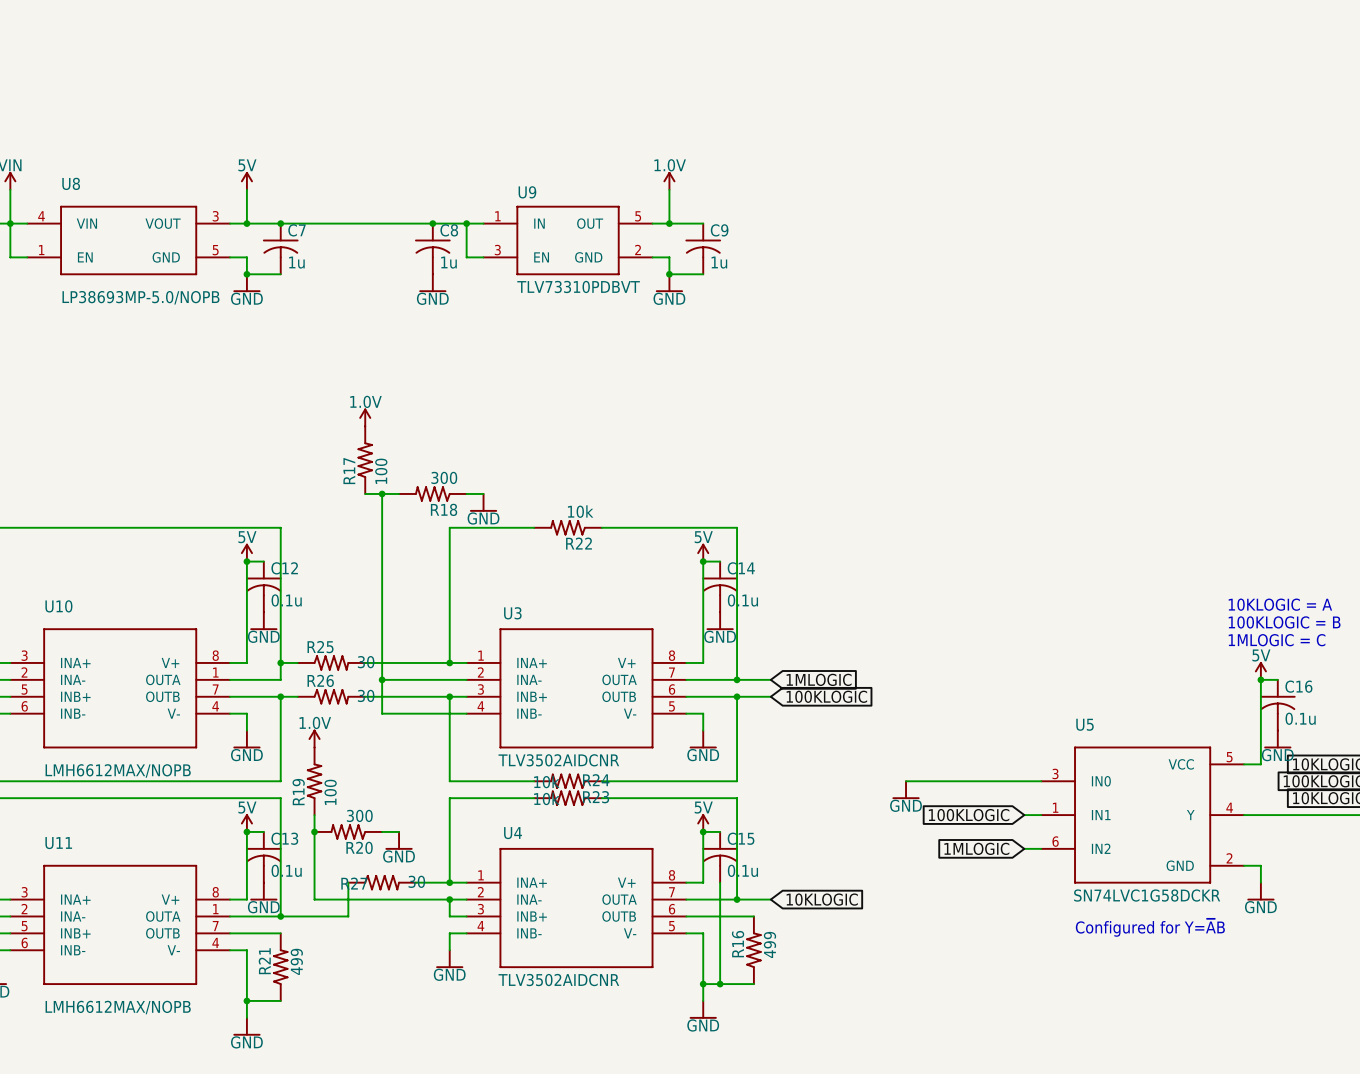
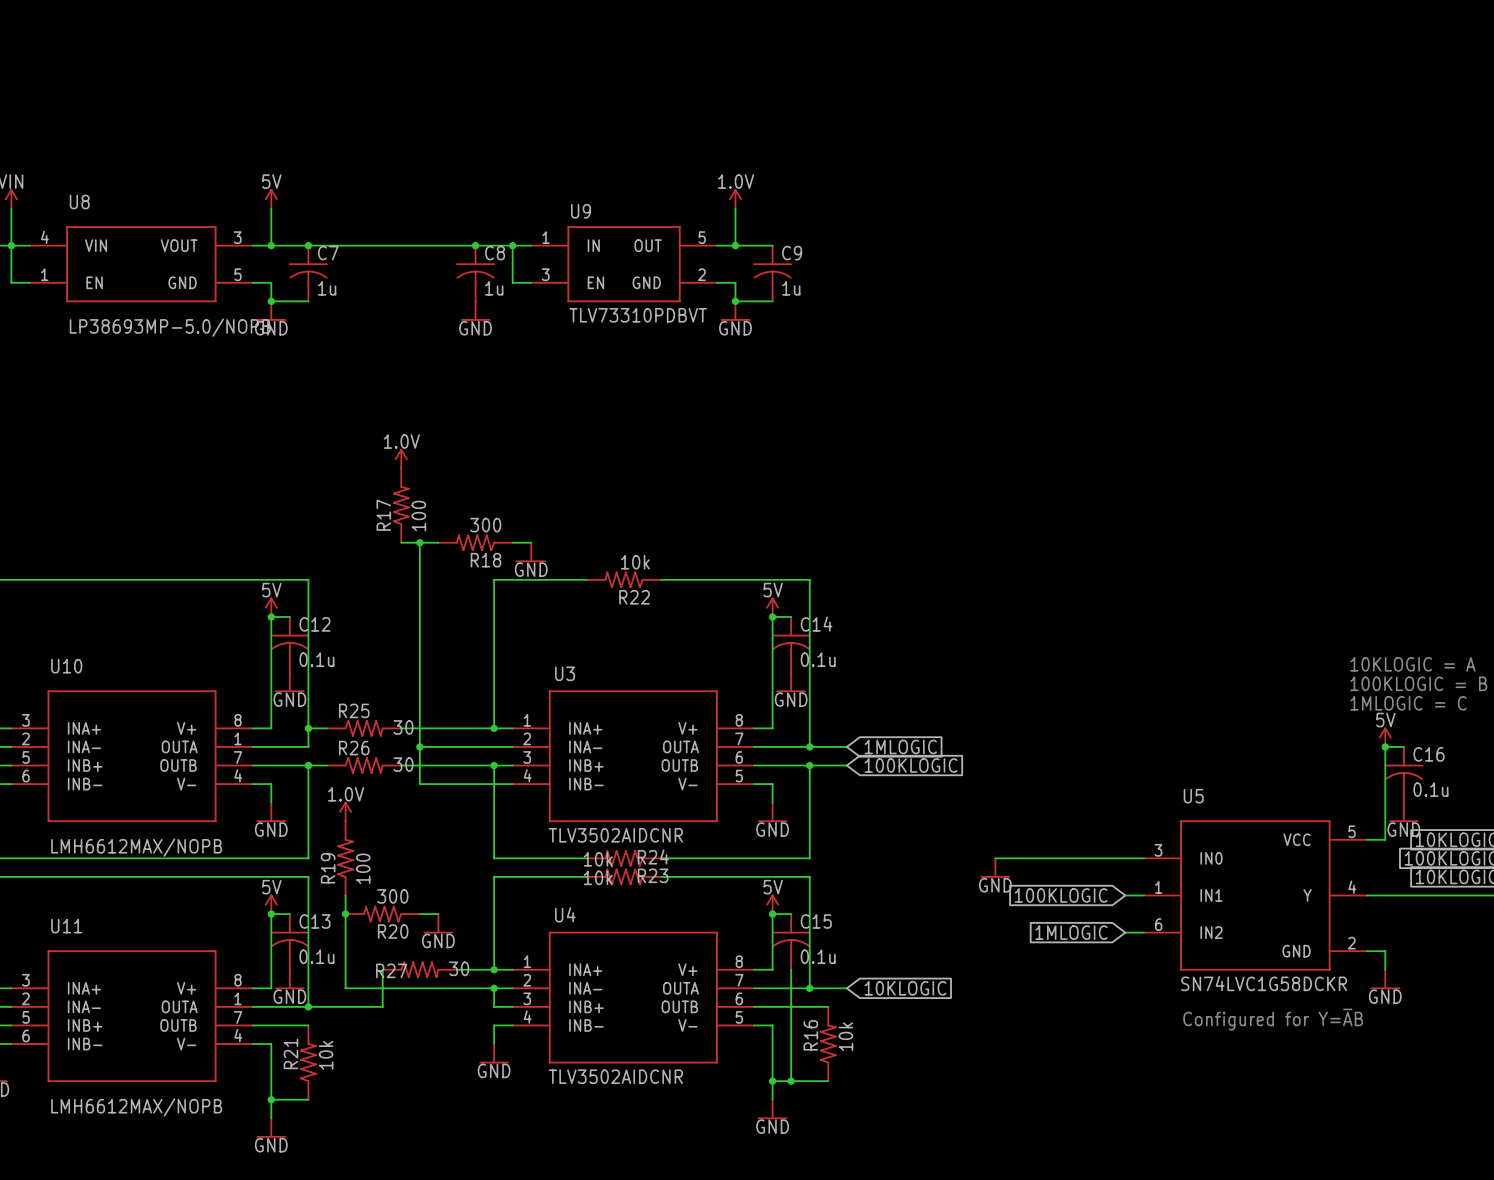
R16 value: 499 (769, 944) -> 10k (845, 1036)
R21 value: 499 (296, 961) -> 10k (326, 1055)

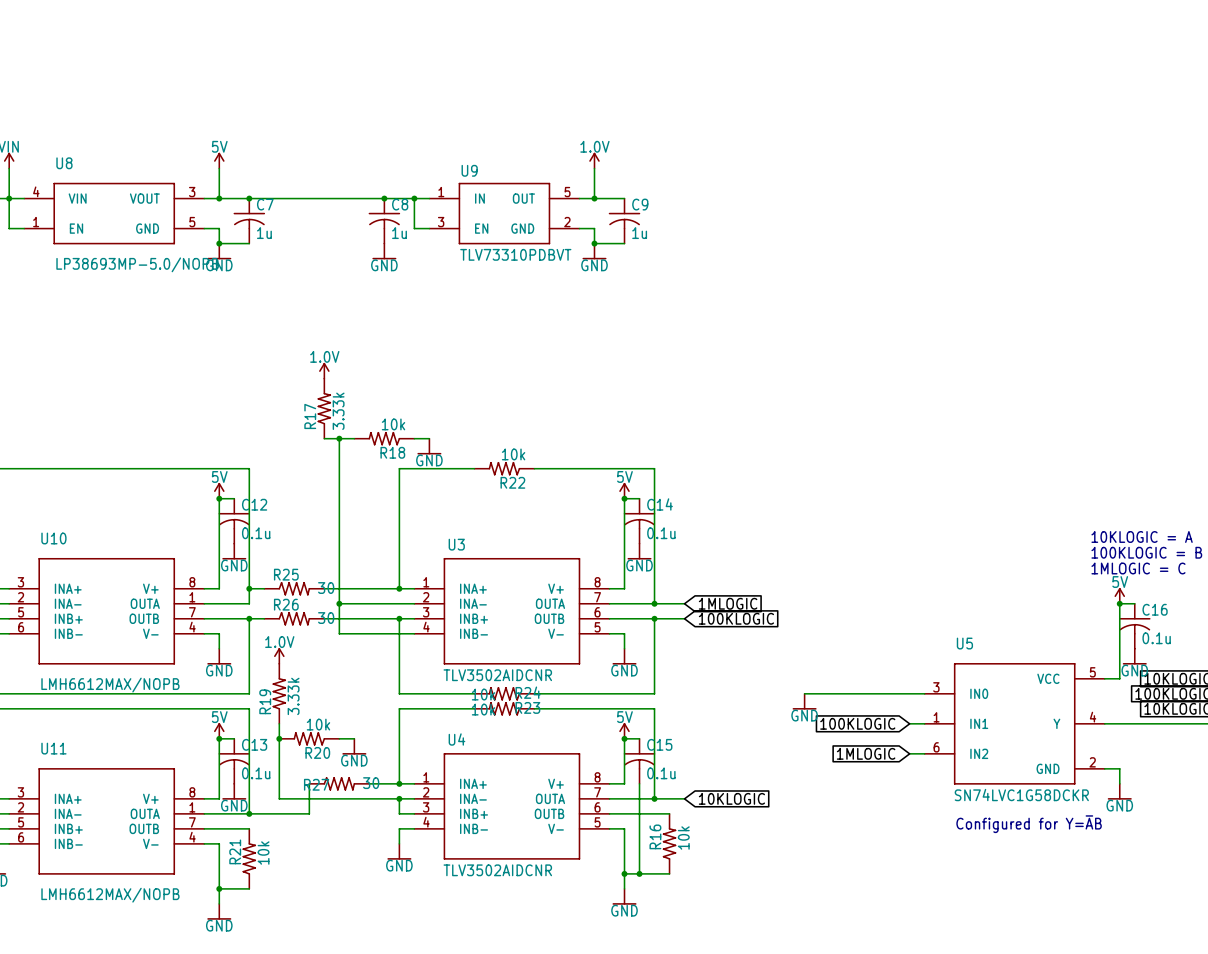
R17 value: 100 (418, 516) -> 3.33k (338, 411)
R18 value: 300 (485, 525) -> 10k (393, 424)
R19 value: 100 (363, 868) -> 3.33k (293, 696)
R20 value: 300 (392, 896) -> 10k (318, 724)

